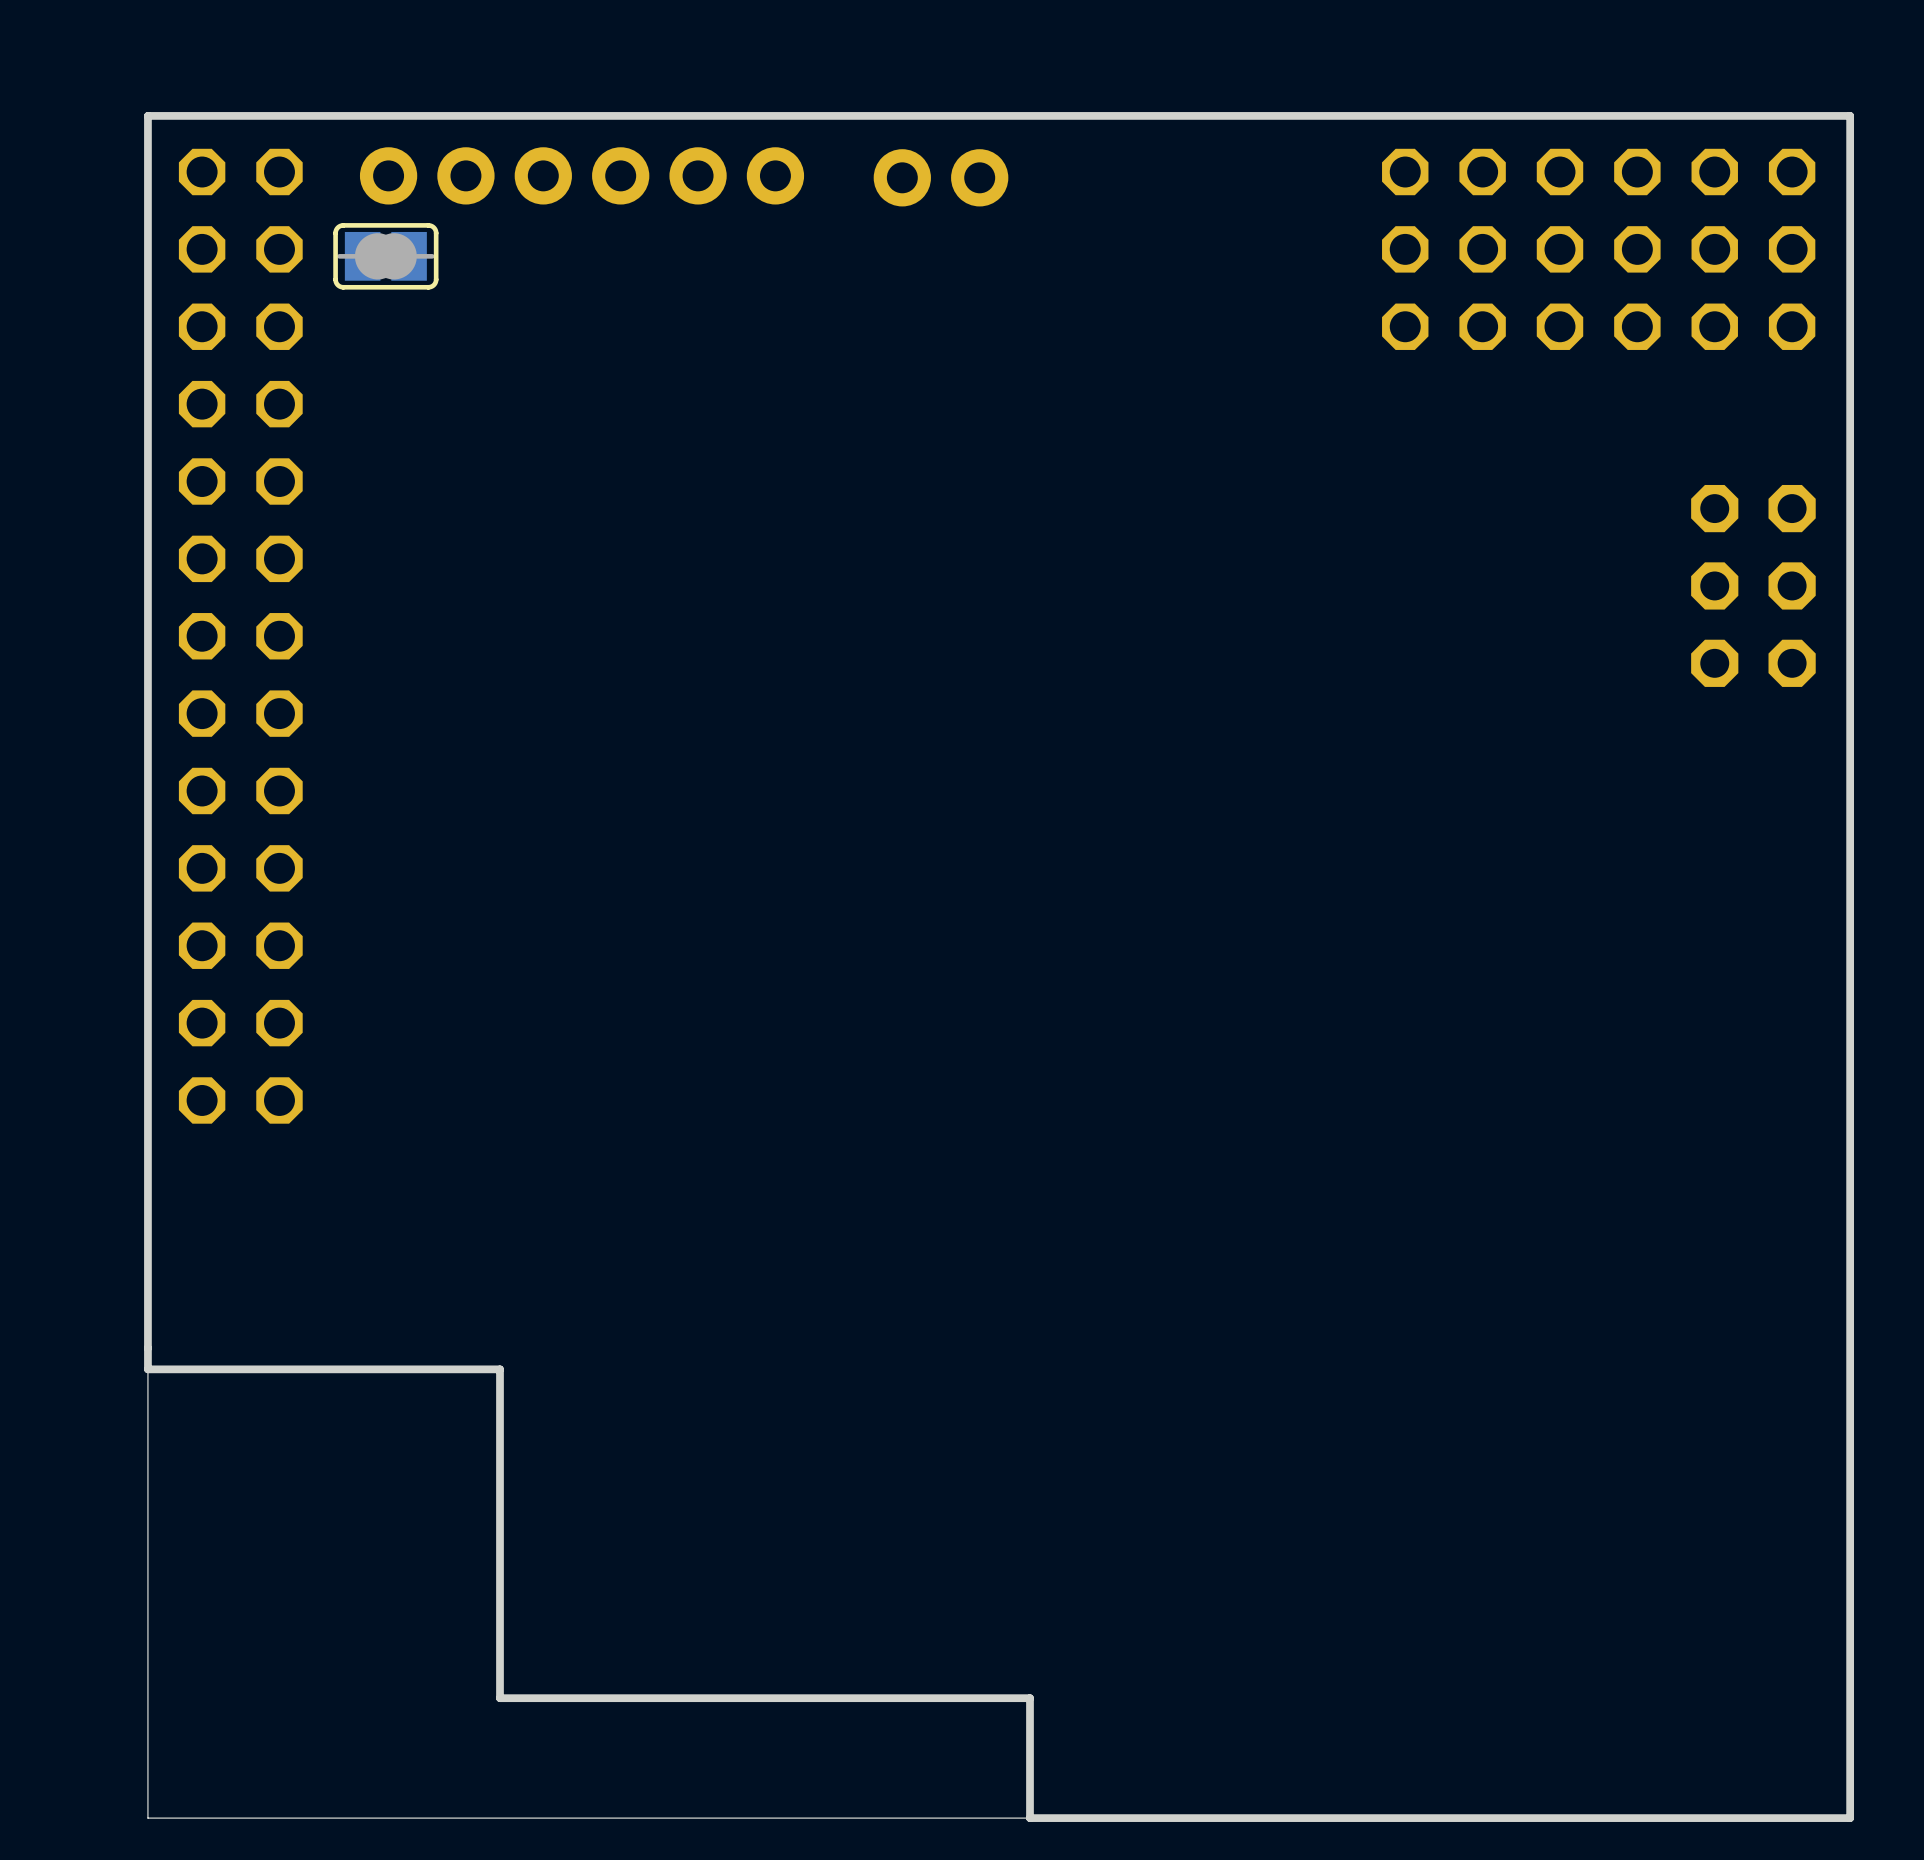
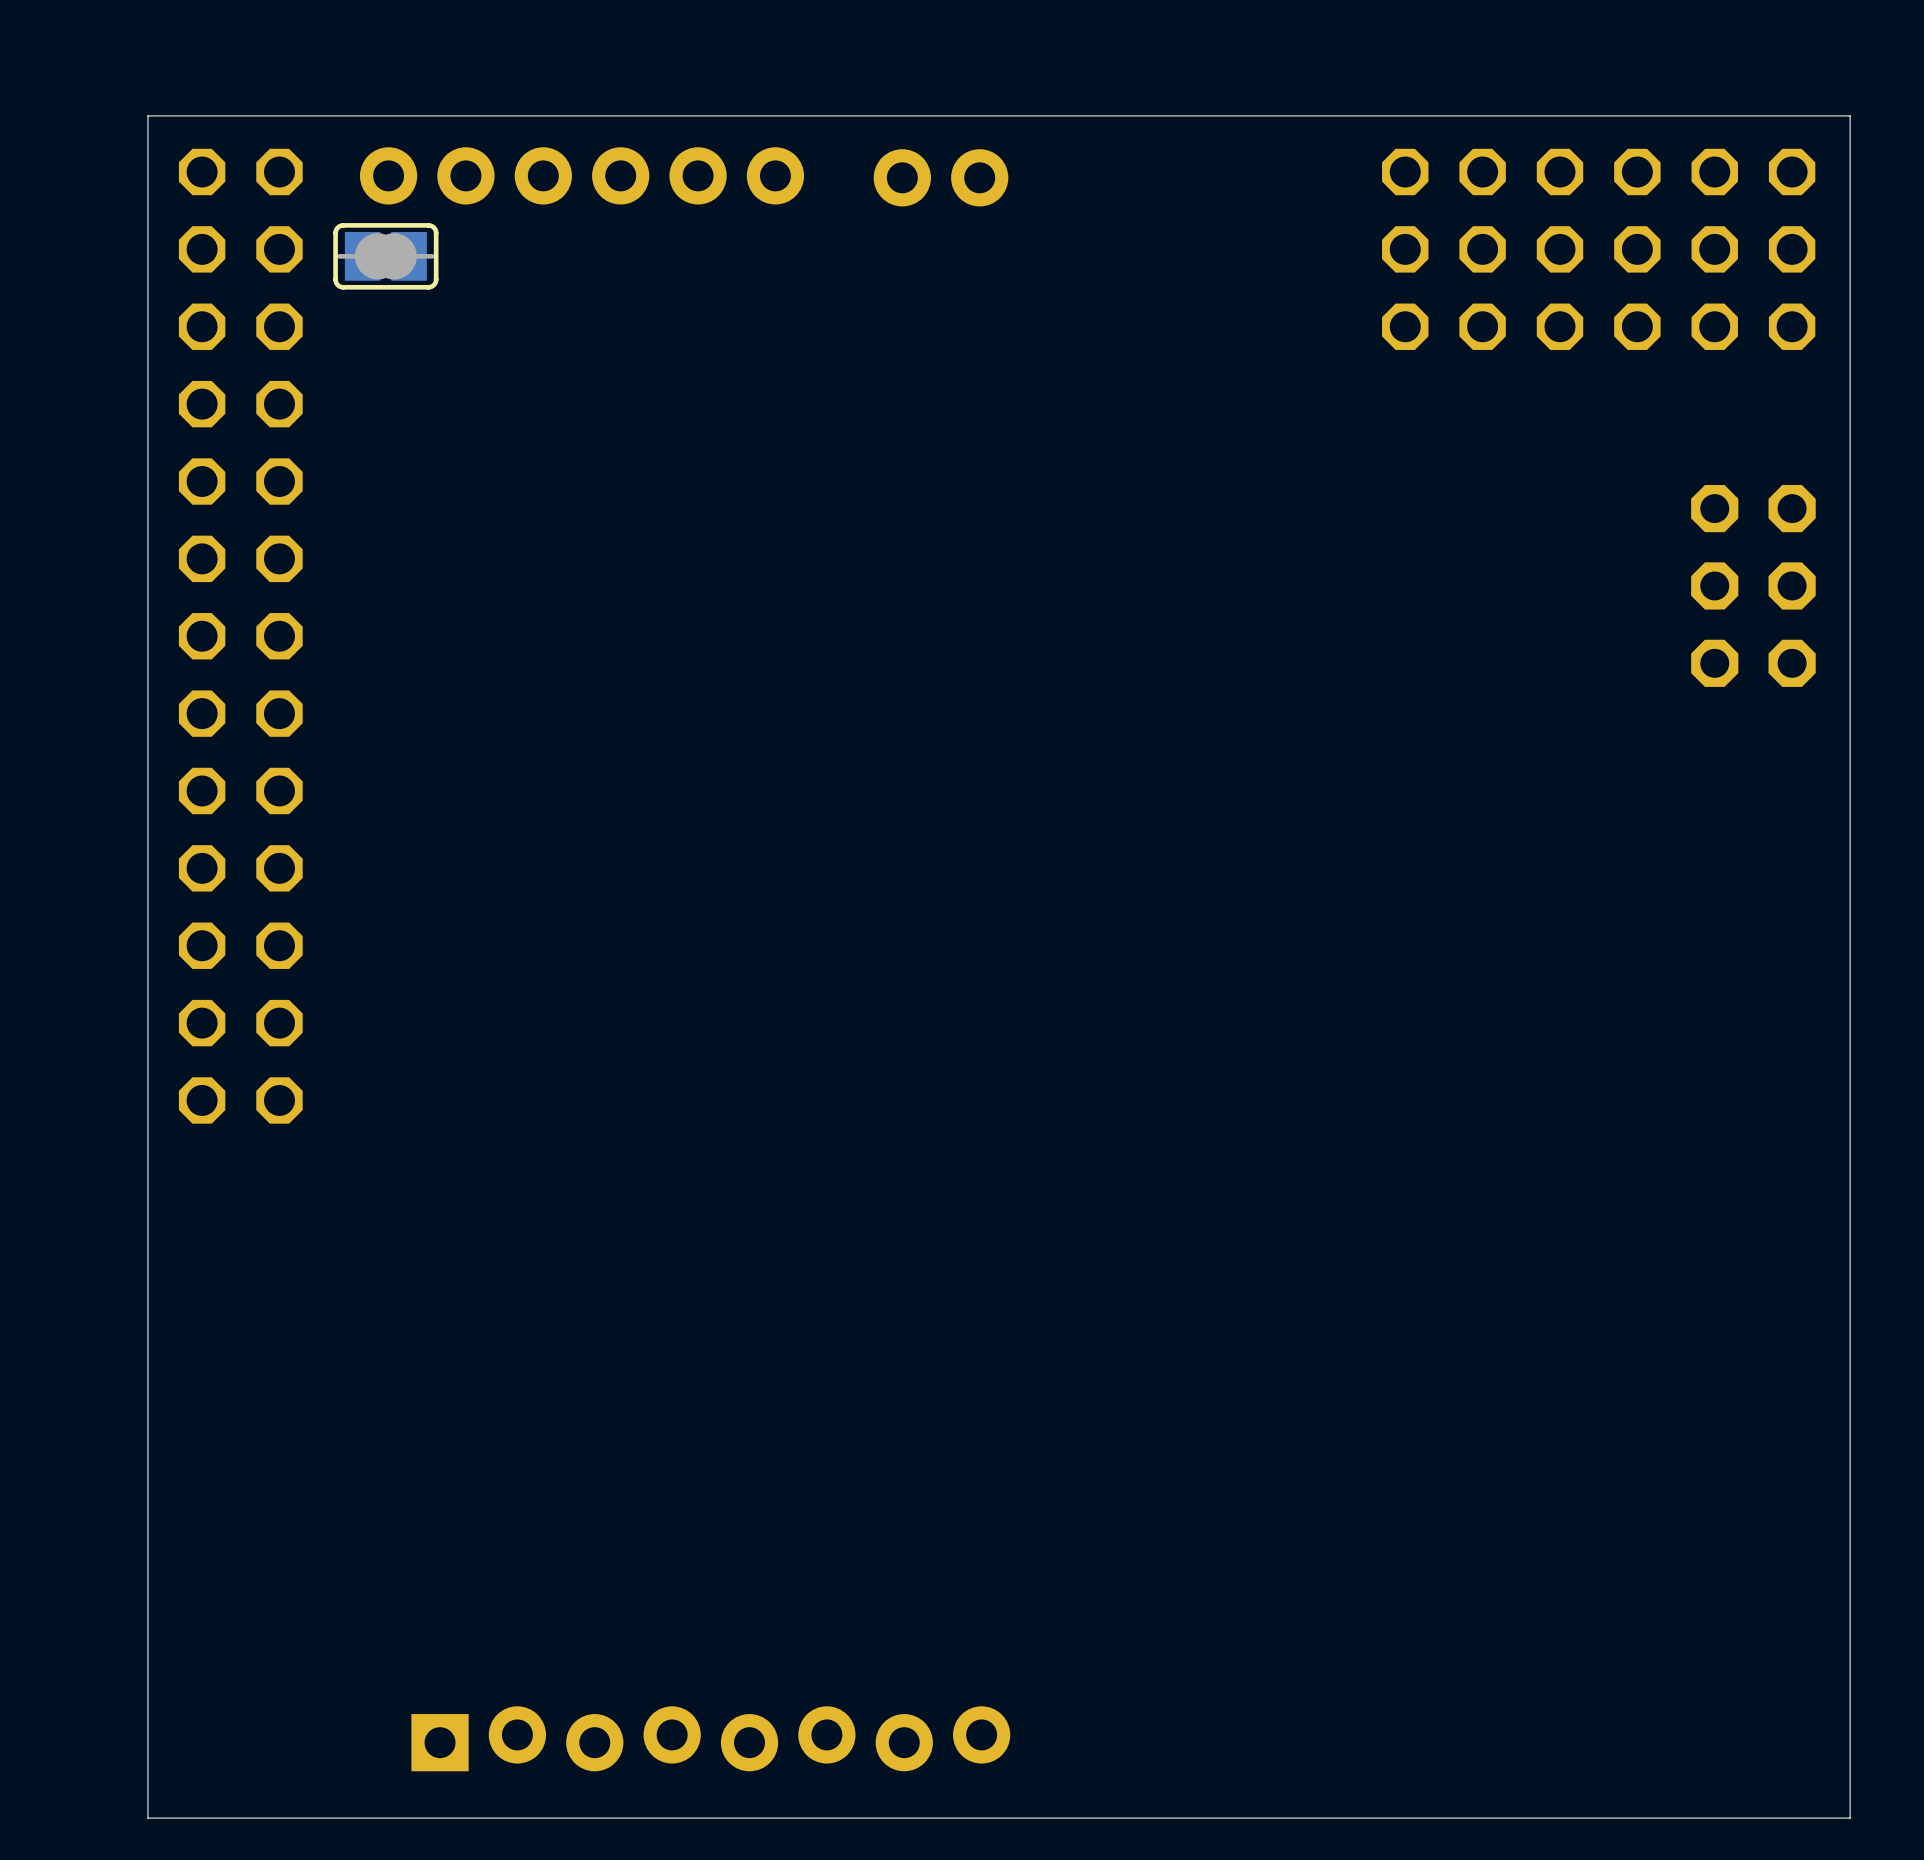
board edge: (1850, 115) (147, 115) (147, 1369) (499, 1369) (499, 1698) (1029, 1698) (1029, 1818) (1850, 1818) (1850, 115) -> none
part: none -> (710, 1738)

